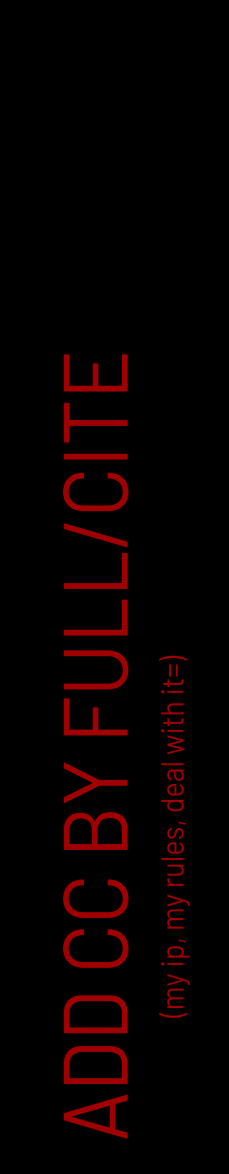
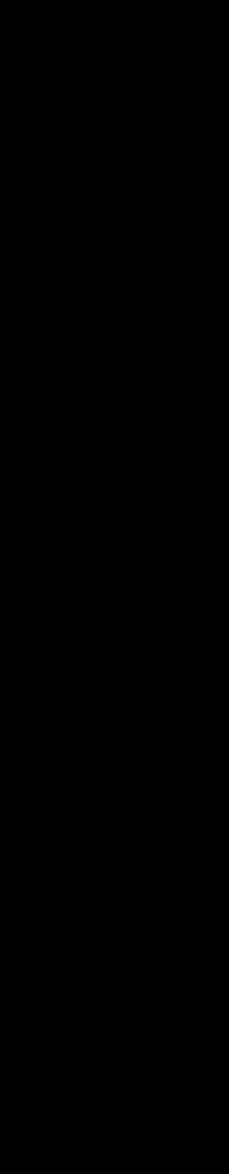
text: ADD CC BY FULL/CITE (95, 746) -> none
text: (my ip, my rules, deal with it=) (174, 836) -> none

